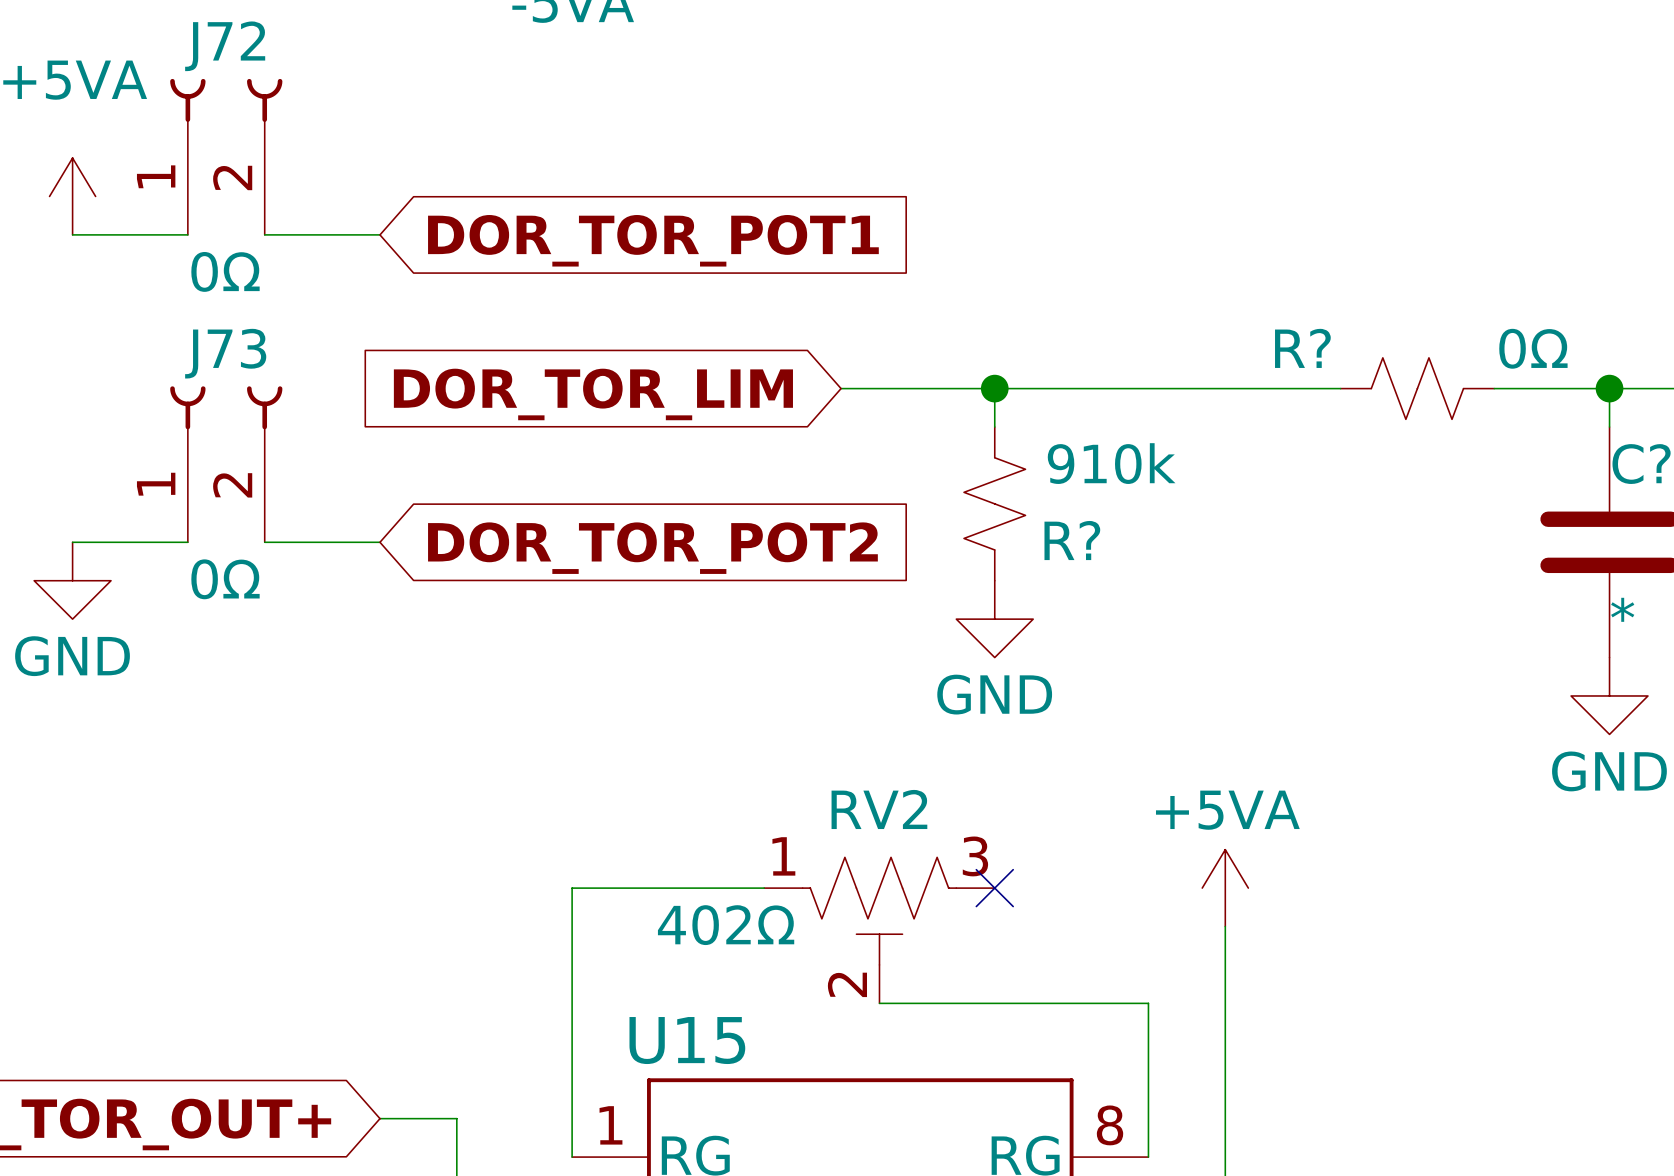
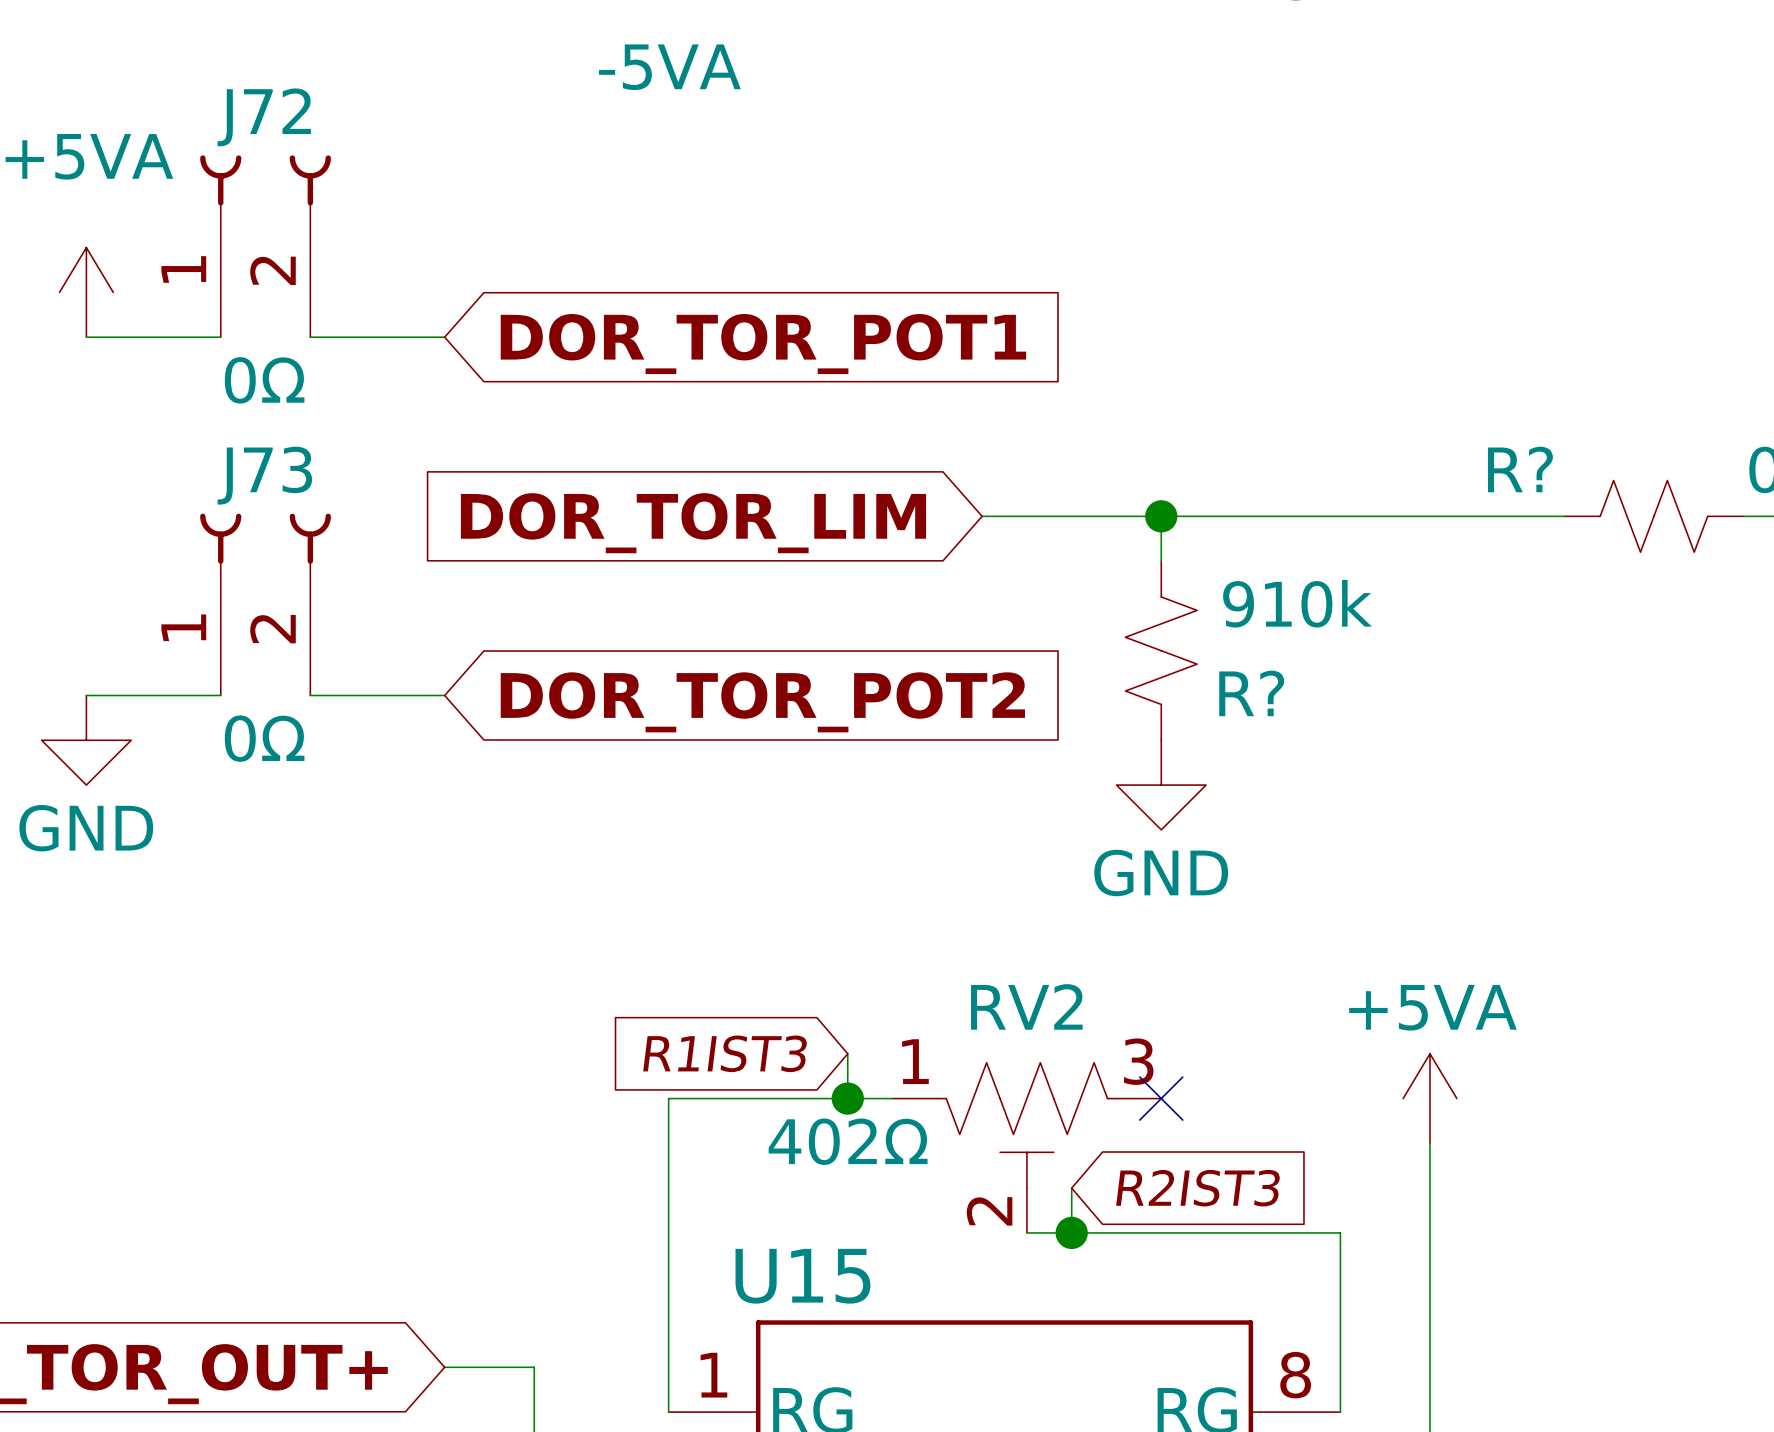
global label: none -> R1IST3 (725, 1053)
wire: none -> (847, 1053) (847, 1098)
junction: none -> (847, 1098)
wire: none -> (1071, 1188) (1071, 1232)
global label: none -> R2IST3 (1198, 1188)
junction: none -> (1071, 1232)

